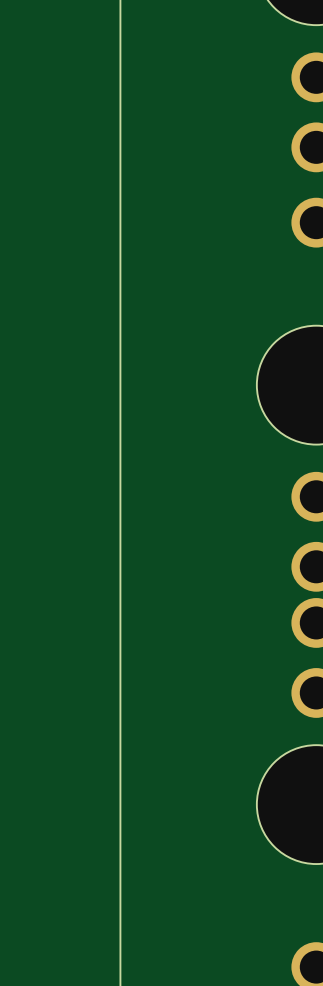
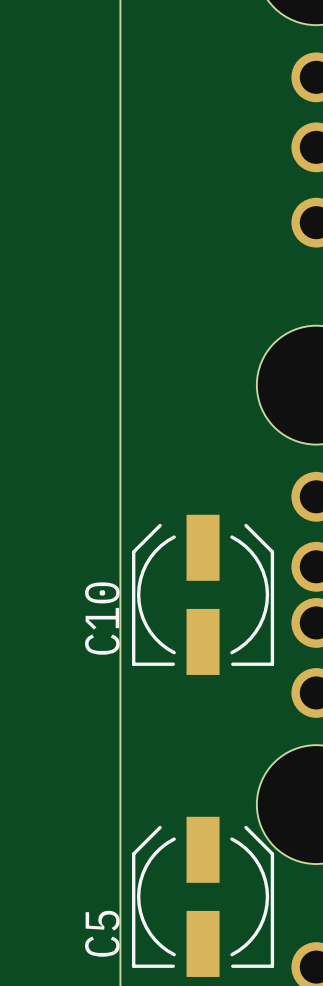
C10: none -> (203, 594)
C5: none -> (203, 896)

